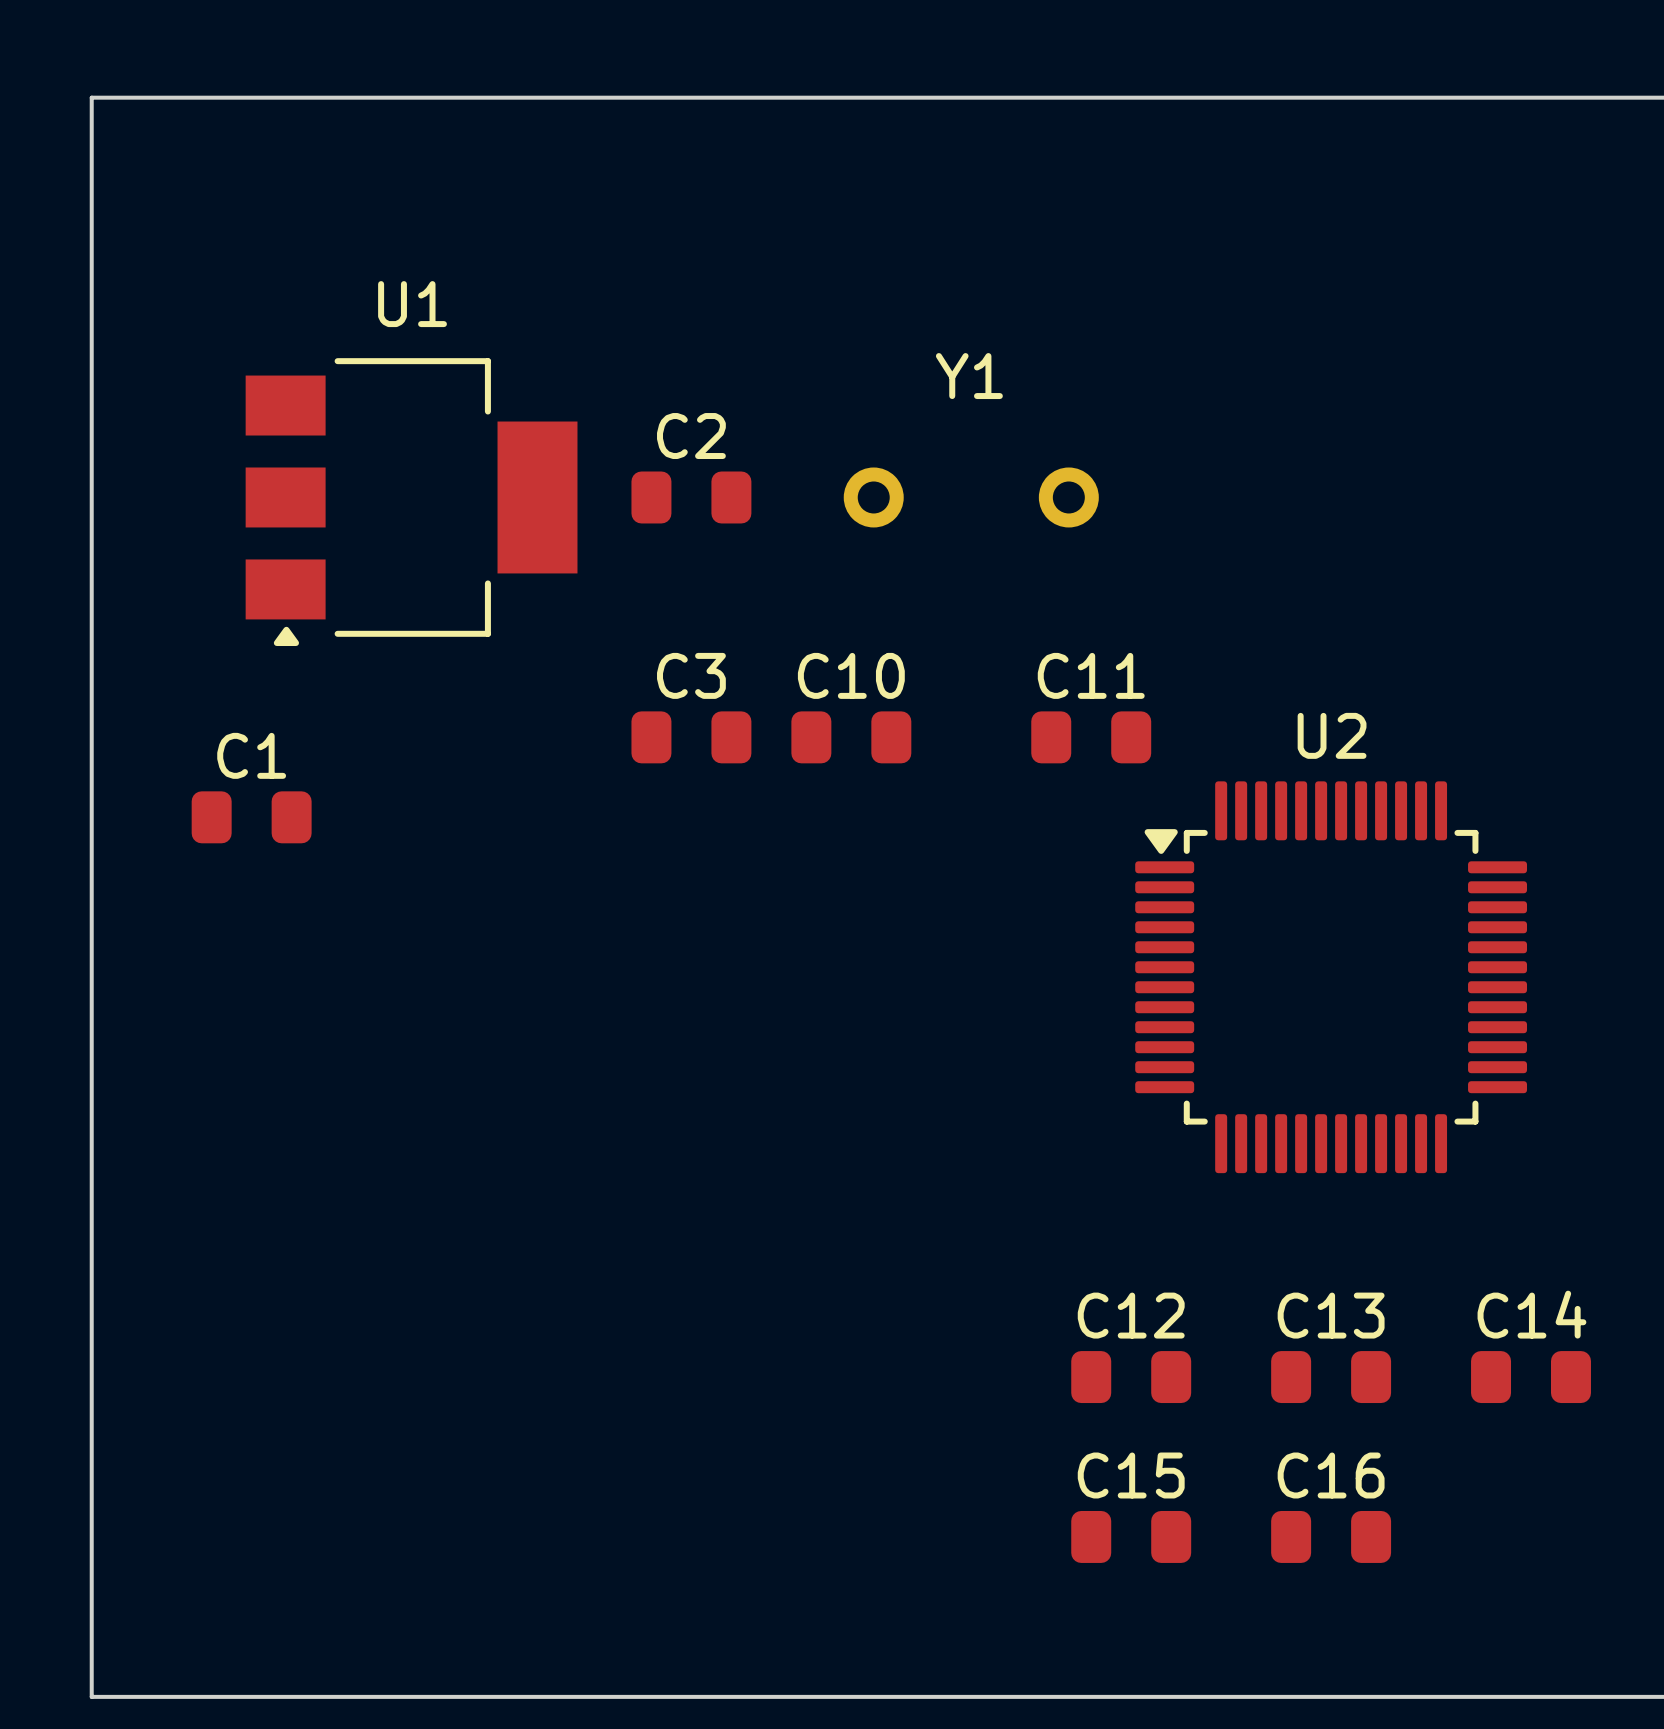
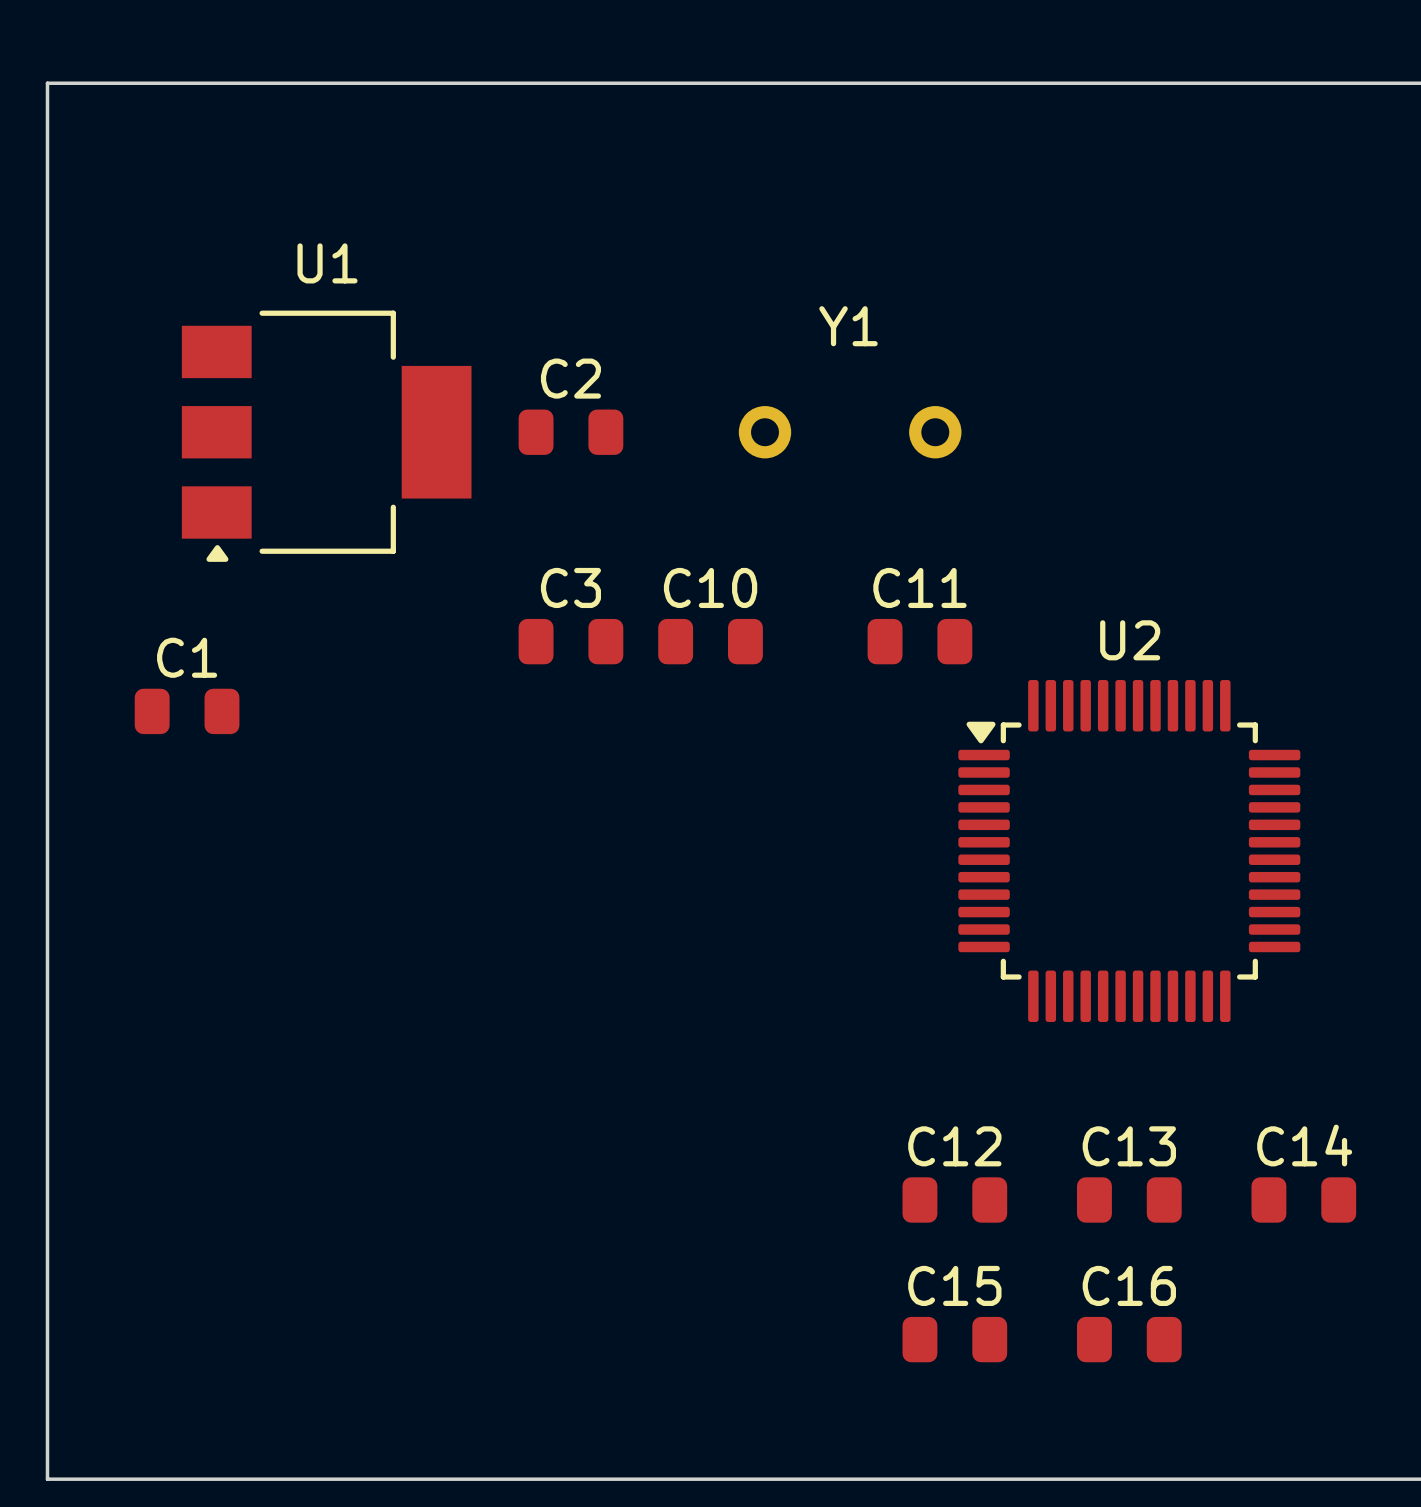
Y1 position: (971, 497) -> (850, 432)

